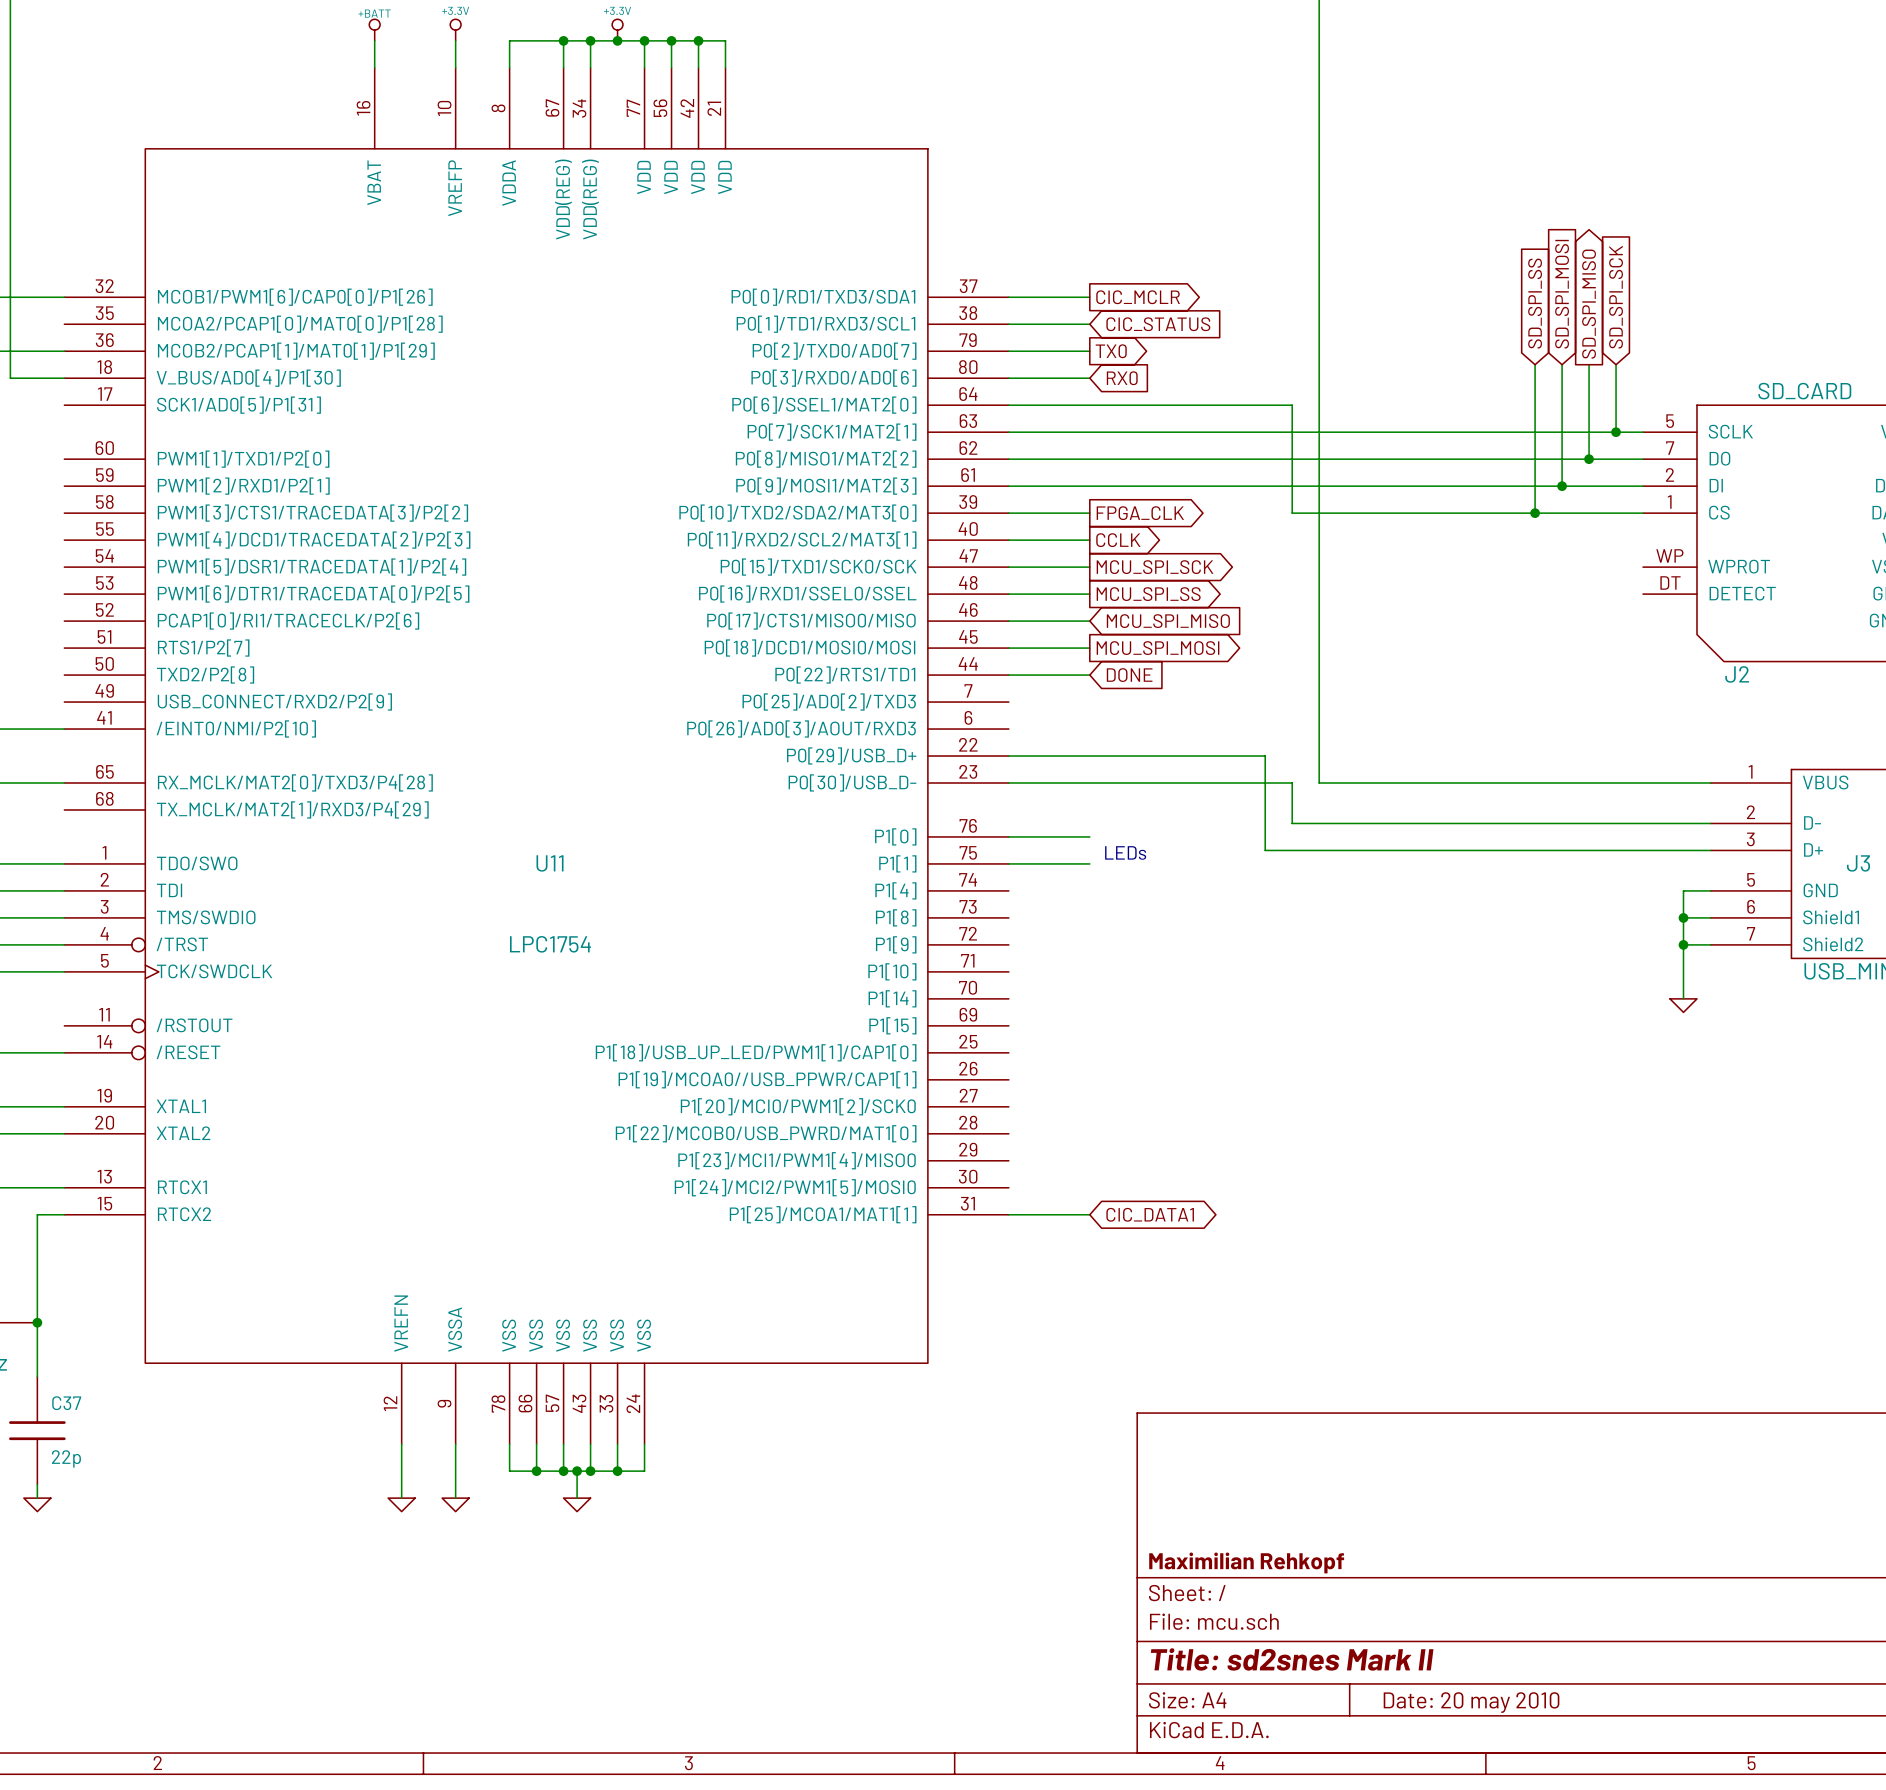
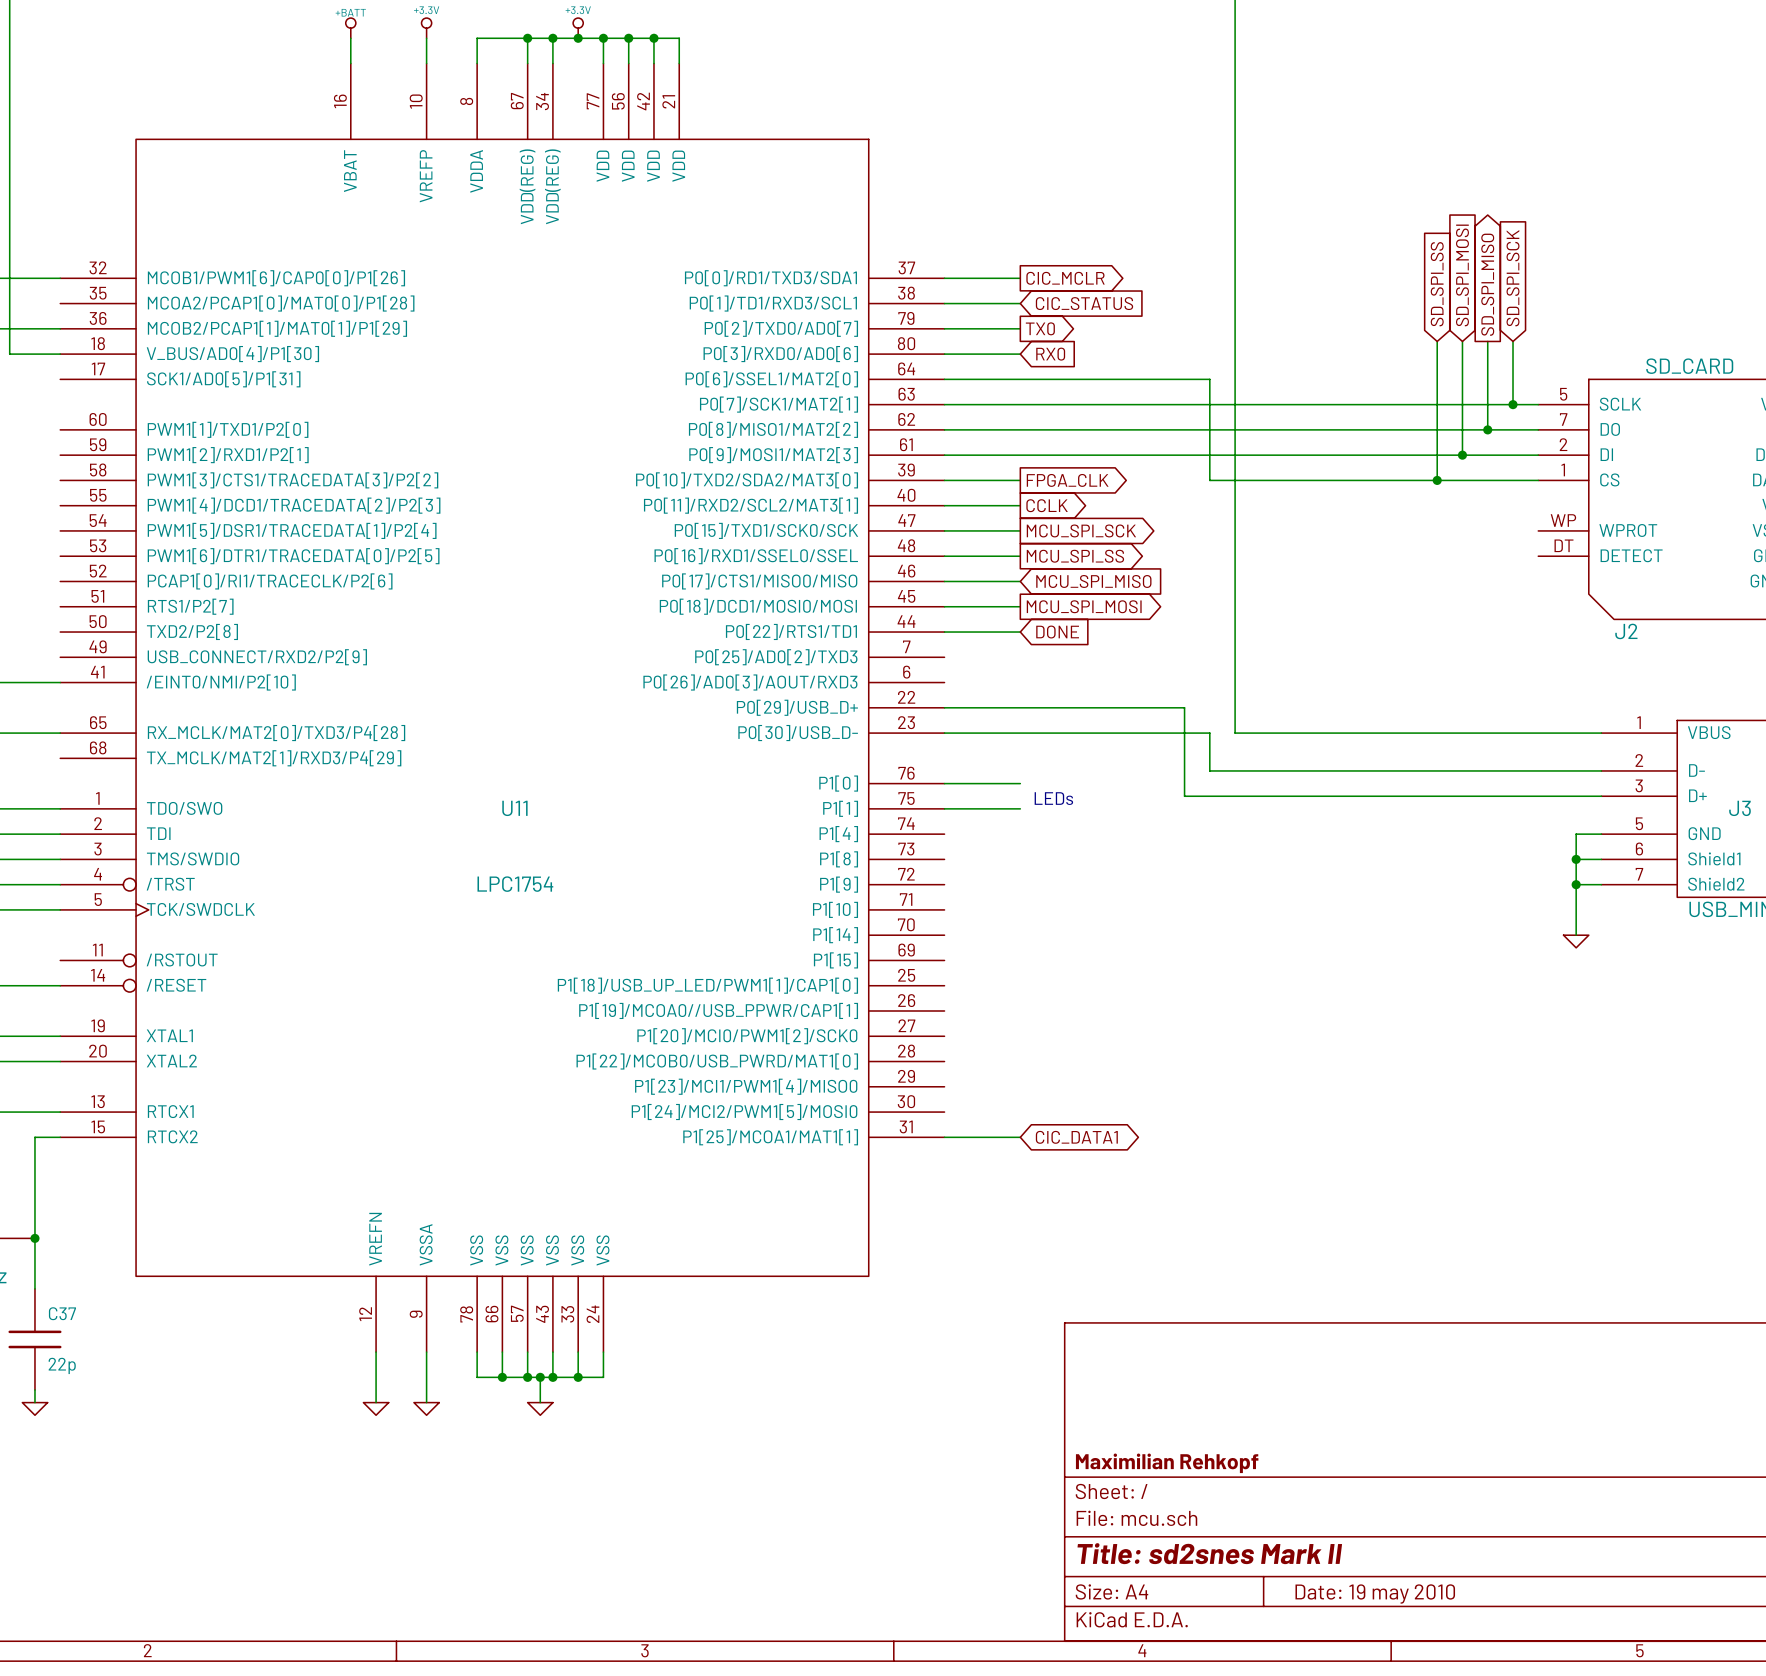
title block: Date: 20 may 2010 (1471, 1702) -> Date: 19 may 2010 (1375, 1593)

